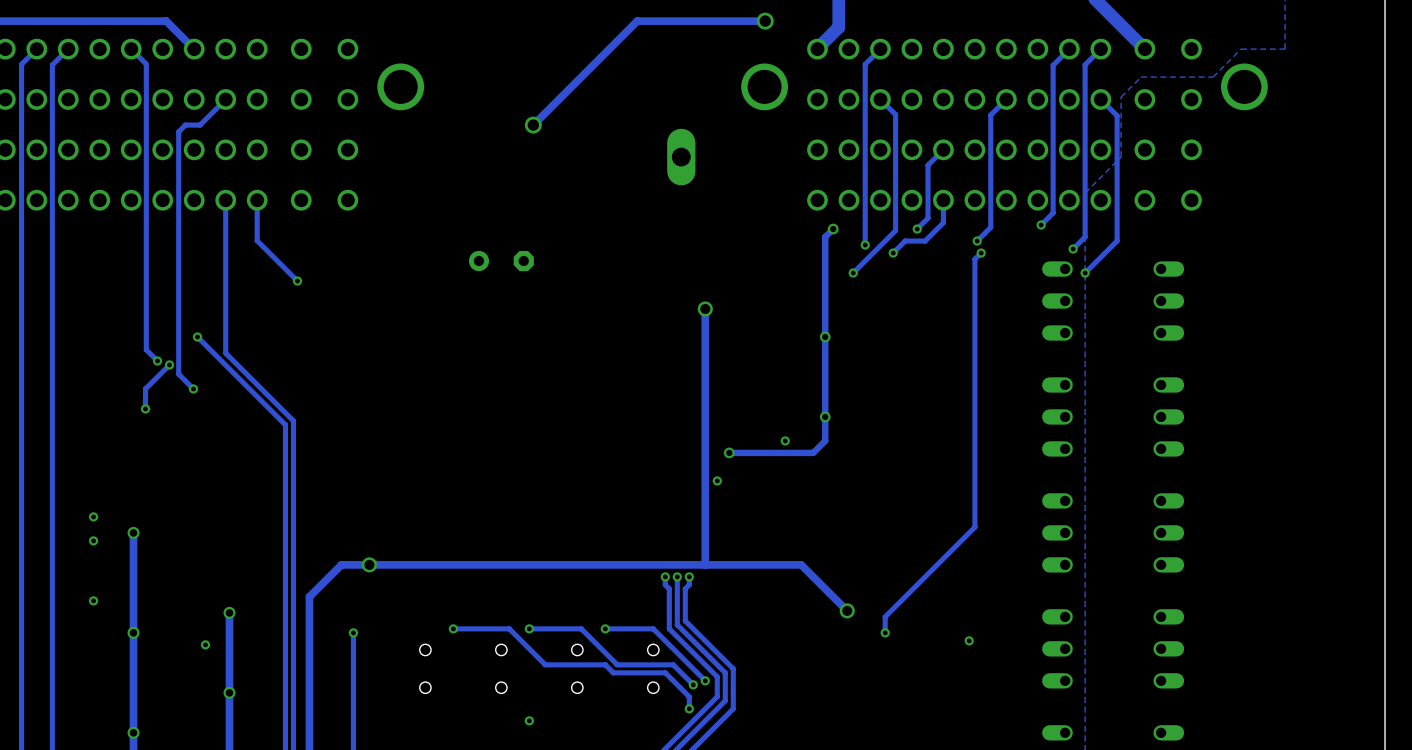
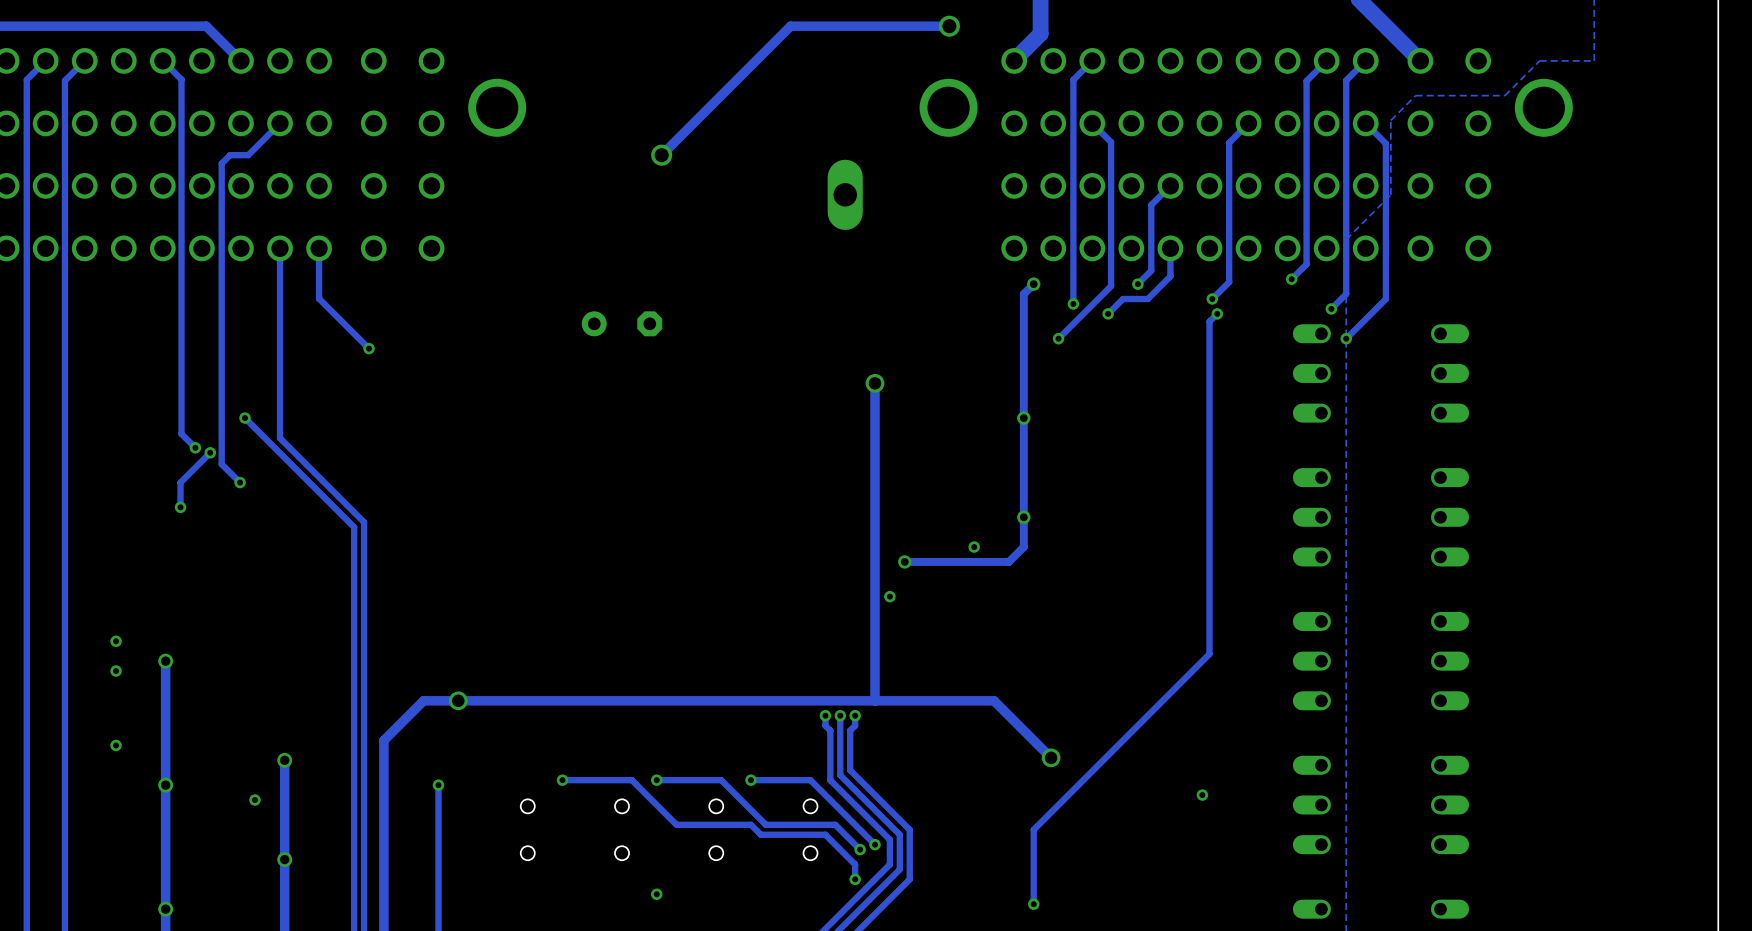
track: (885, 616) (885, 632) -> (1098, 765) (1033, 829) (1033, 904)
via: (885, 632) -> none
via: none -> (1033, 904)

